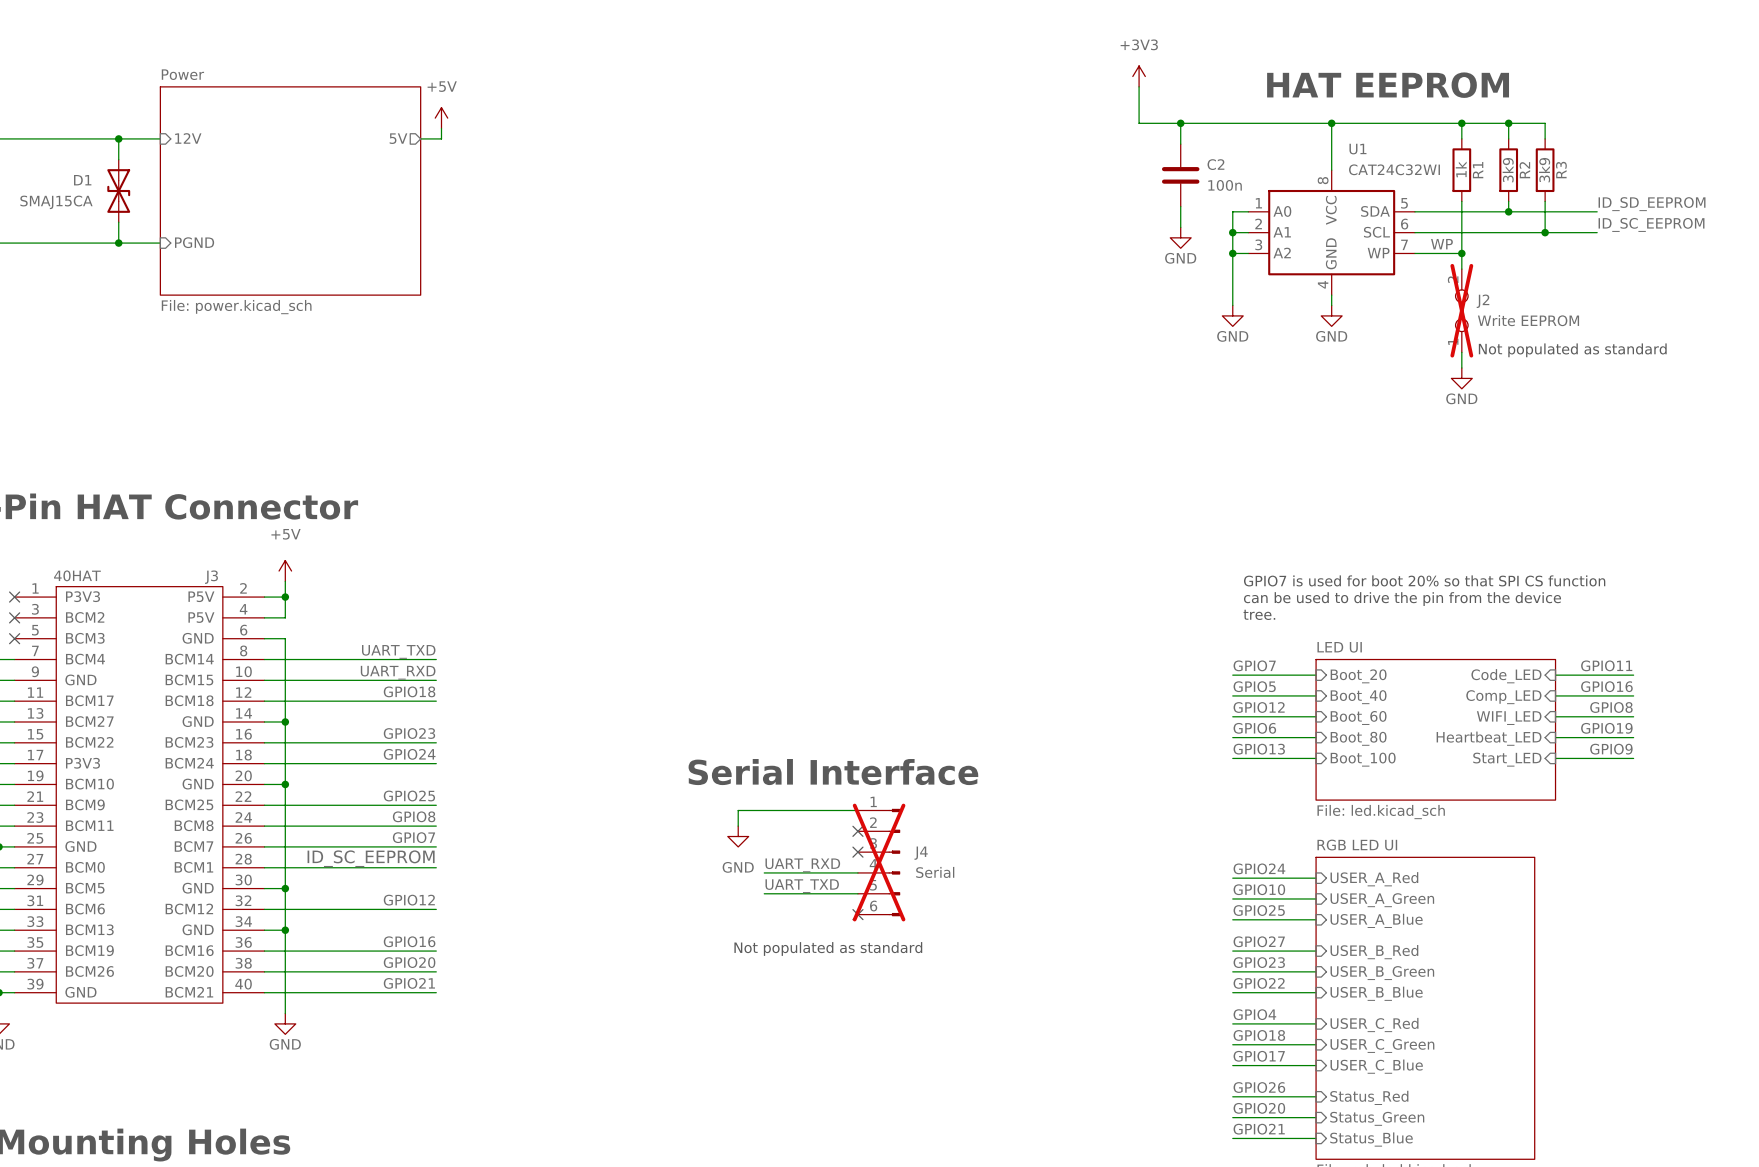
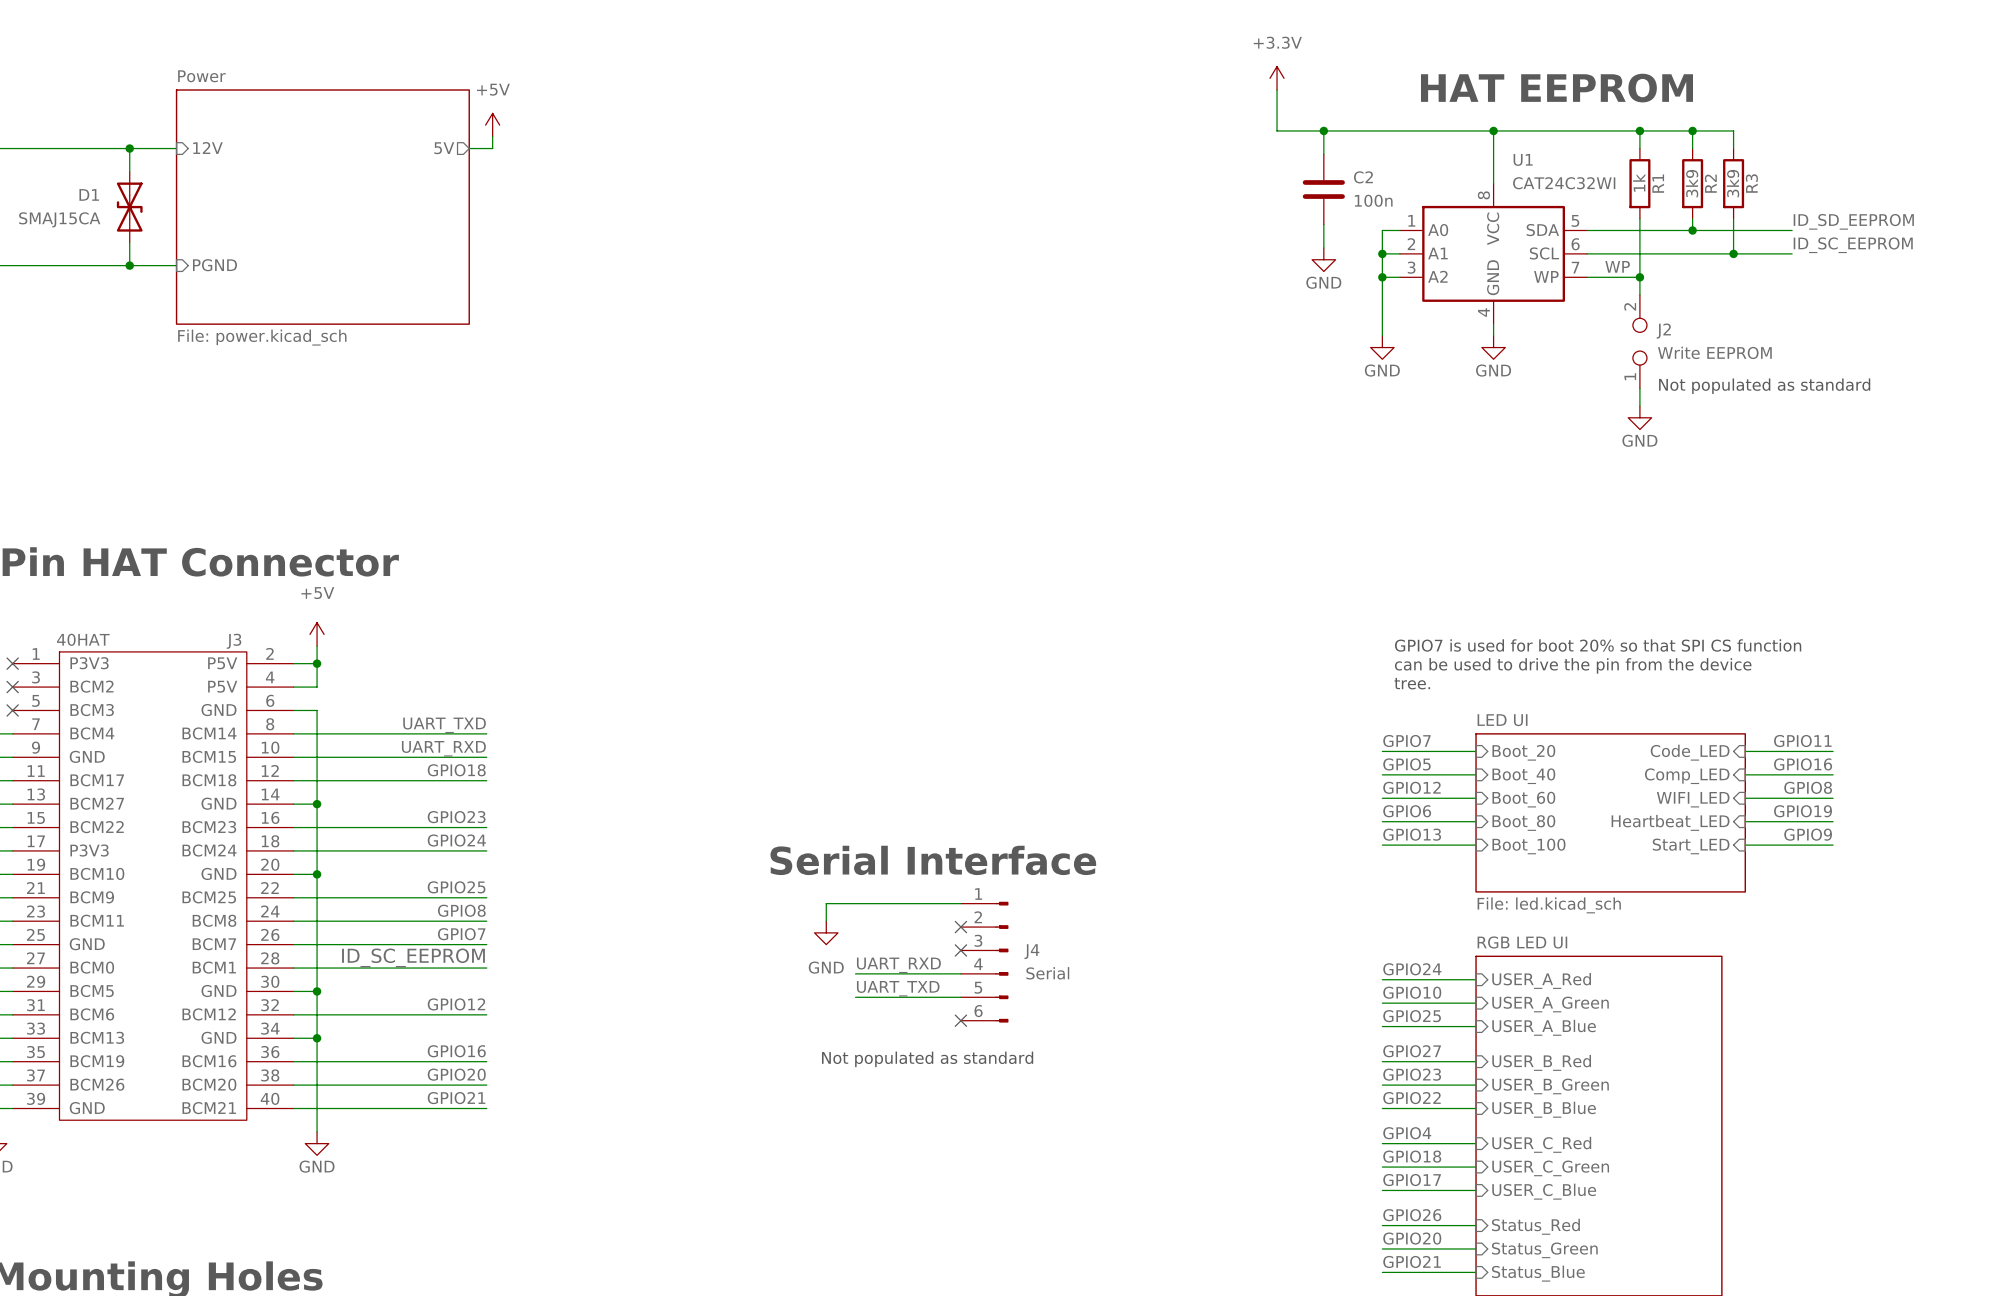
power symbol: +3V3 (1139, 76) -> +3.3V (1277, 78)
J2 do-not-place cross: (1461, 310) -> none
J4 do-not-place cross: (879, 862) -> none

